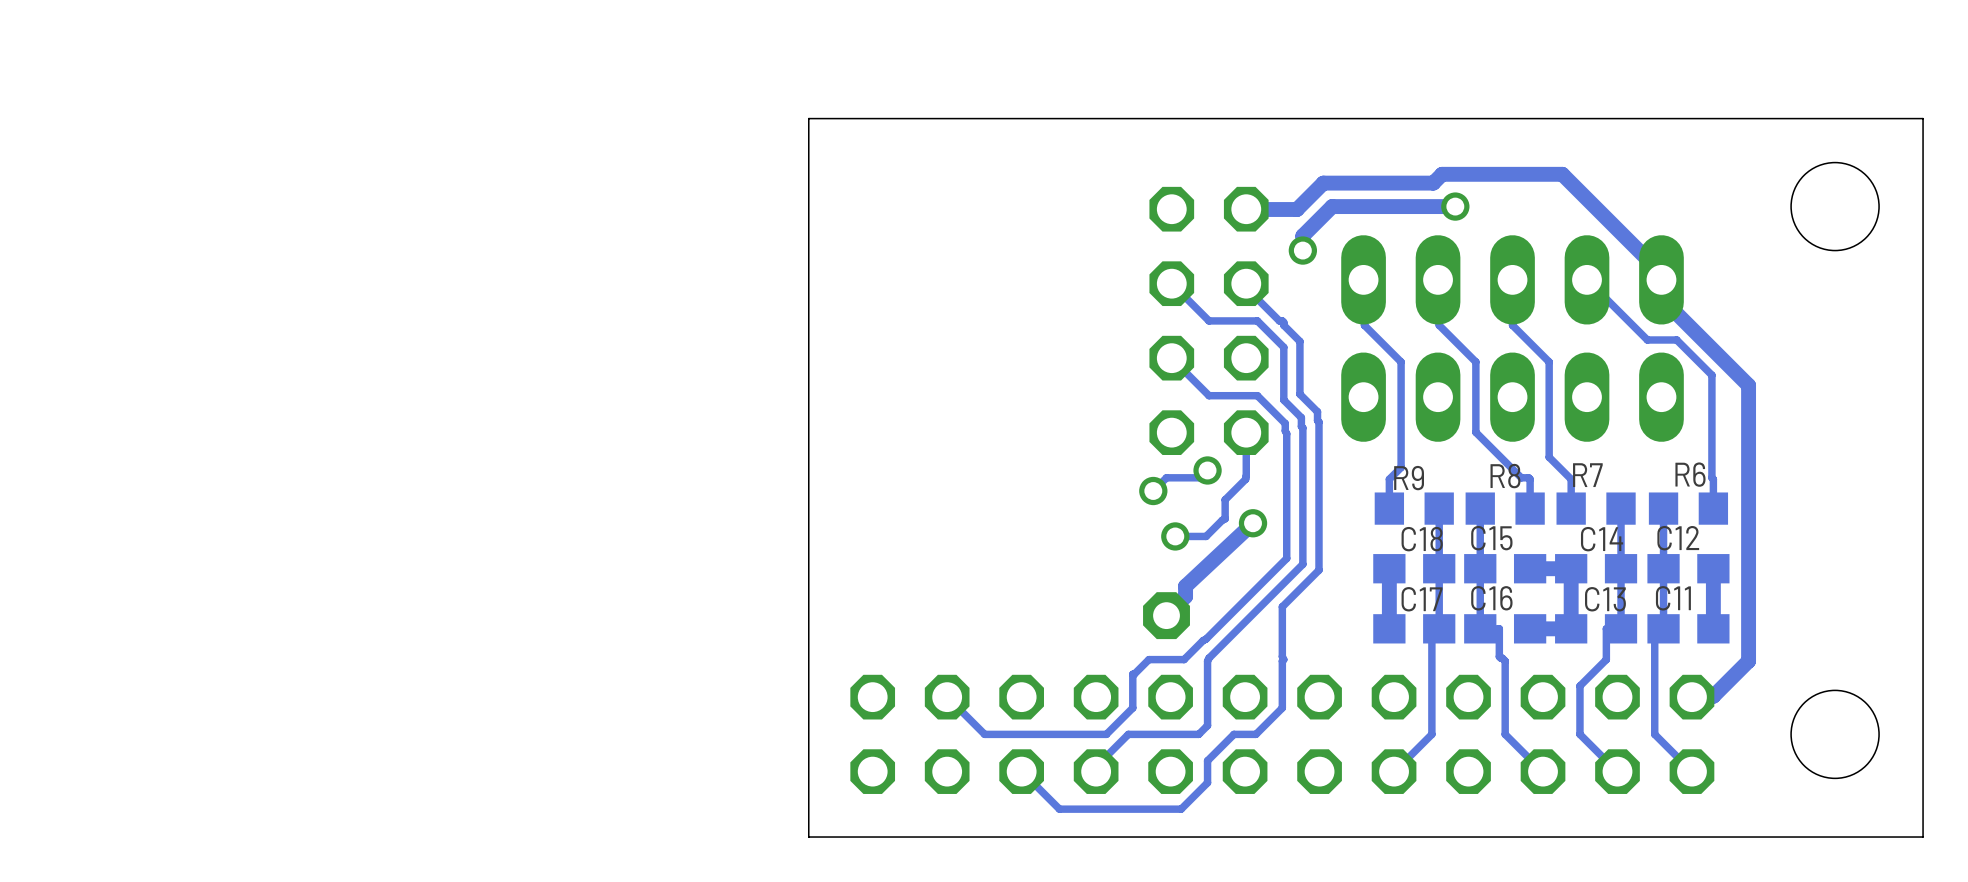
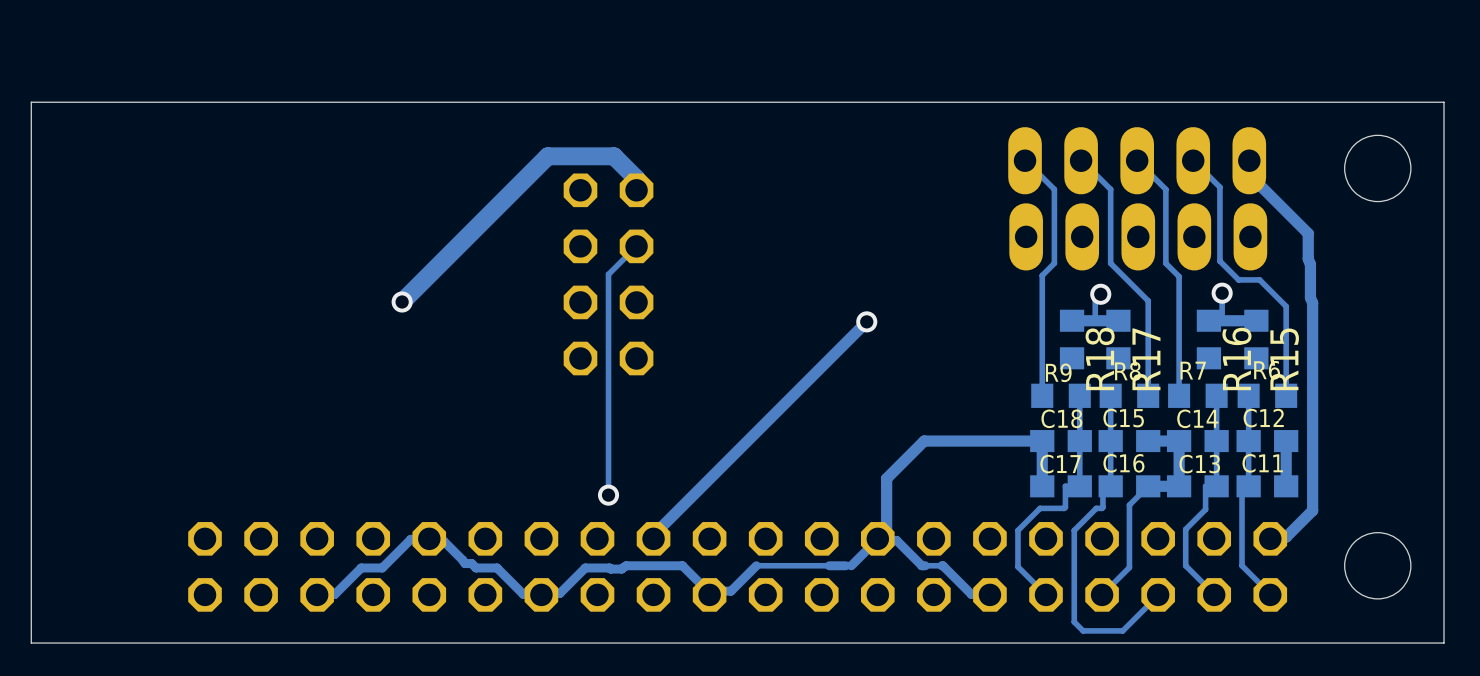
board edge: (808, 118) (808, 837) -> (605, 102) (31, 102) (31, 643) (605, 643)
track: (1455, 206) (1332, 206) (1302, 235) (1302, 250) -> none
via: (1455, 206) -> none
track: (1246, 209) (1296, 209) (1323, 183) (1433, 183) (1442, 174) (1562, 174) (1660, 272) (1661, 279) -> none
track: none -> (636, 190) (636, 178) (614, 156) (547, 156) (402, 302)
via: (1302, 250) -> none
track: (1363, 279) (1364, 325) (1401, 361) (1401, 467) (1389, 479) -> (1025, 160) (1054, 189) (1054, 263) (1042, 275) (1042, 373)
track: (1438, 279) (1439, 325) (1475, 361) (1475, 432) (1521, 477) (1530, 479) -> (1081, 160) (1110, 189) (1110, 263) (1148, 300) (1148, 373)
track: (1512, 279) (1512, 325) (1549, 361) (1549, 457) (1571, 479) -> (1137, 160) (1165, 189) (1165, 263) (1179, 276) (1179, 373)
part position: (1512, 279) -> (1138, 236)
track: (1587, 279) (1647, 339) (1676, 339) (1711, 375) (1713, 479) -> (1193, 160) (1219, 187) (1219, 261) (1238, 279) (1259, 279) (1286, 306) (1286, 373)
track: (1662, 279) (1662, 298) (1748, 385) -> (1249, 160) (1249, 175) (1308, 233) (1310, 297) (1312, 303)
track: (1171, 283) (1209, 320) (1257, 320) (1283, 347) (1283, 400) (1301, 417) (1302, 427) (1302, 564) (1209, 658) (1207, 725) (1198, 734) (1135, 734) -> (877, 539) (851, 565)
track: (1247, 284) (1248, 290) (1279, 320) (1282, 320) (1283, 325) (1299, 341) (1299, 394) (1317, 411) (1318, 422) (1318, 570) (1282, 606) (1282, 707) (1255, 734) -> (989, 594) (971, 594) (941, 565)
track: none -> (636, 246) (608, 274) (608, 495)
part position: (1209, 320) -> (608, 274)
track: (1171, 358) (1209, 395) (1257, 395) (1285, 423) (1286, 558) (1184, 659) (1148, 659) (1132, 674) (1132, 707) (1106, 734) -> none
track: none -> (1222, 293) (1222, 320) (1208, 320) (1256, 320)
via: none -> (1222, 293)
track: none -> (1100, 294) (1095, 299) (1095, 319) (1094, 320) (1072, 320) (1118, 320)
via: none -> (1100, 294)
via: none -> (402, 302)
part position: (1512, 397) -> (1137, 160)
track: none -> (866, 321) (653, 534) (653, 538)
via: none -> (866, 321)
track: (1246, 432) (1245, 479) (1225, 499) (1225, 518) (1206, 536) (1175, 536) -> none
R18: none -> (1072, 339)
R17: none -> (1118, 339)
R16: none -> (1208, 339)
R15: none -> (1256, 339)
track: (1207, 470) (1200, 477) (1166, 477) (1153, 491) -> none
via: (1207, 470) -> none
via: (1153, 491) -> none
track: (1253, 523) (1185, 586) (1185, 596) (1166, 615) -> none
via: (1253, 523) -> none
via: (1175, 536) -> none
part: (1166, 615) -> none
track: (1431, 628) (1431, 687) -> (1110, 486) (1102, 486) (1102, 507) (1096, 508) (1074, 530)
track: none -> (1074, 486) (1065, 486) (1064, 508) (1040, 508) (1017, 530) (1017, 566) (1046, 594)
track: (1480, 628) (1499, 628) (1499, 656) (1505, 661) -> (1148, 486) (1129, 505) (1129, 510)
via: none -> (608, 495)
track: (947, 697) (984, 734) (1009, 734) -> (317, 594) (334, 594) (361, 567) (382, 567) (410, 539) (429, 538) (433, 541) (444, 541) (465, 563) (471, 563) (476, 567) (497, 567) (523, 594) (559, 593) (585, 567) (621, 569) (626, 565) (682, 565) (709, 594) (713, 591) (731, 591) (756, 565)
track: (1128, 734) (1096, 766) (1096, 771) -> (845, 565) (829, 565)
track: (1233, 734) (1207, 760) (1207, 782) (1181, 809) (1059, 809) (1021, 771) -> (925, 565) (921, 565) (896, 540) (877, 538) (886, 530) (886, 478) (924, 441) (1042, 441)
part: (1282, 734) -> none
track: (1431, 734) (1394, 771) -> (1074, 565) (1074, 622) (1083, 630) (1122, 630) (1158, 594)
track: (1505, 734) (1543, 771) -> (1129, 565) (1102, 594)
part: none -> (737, 566)

